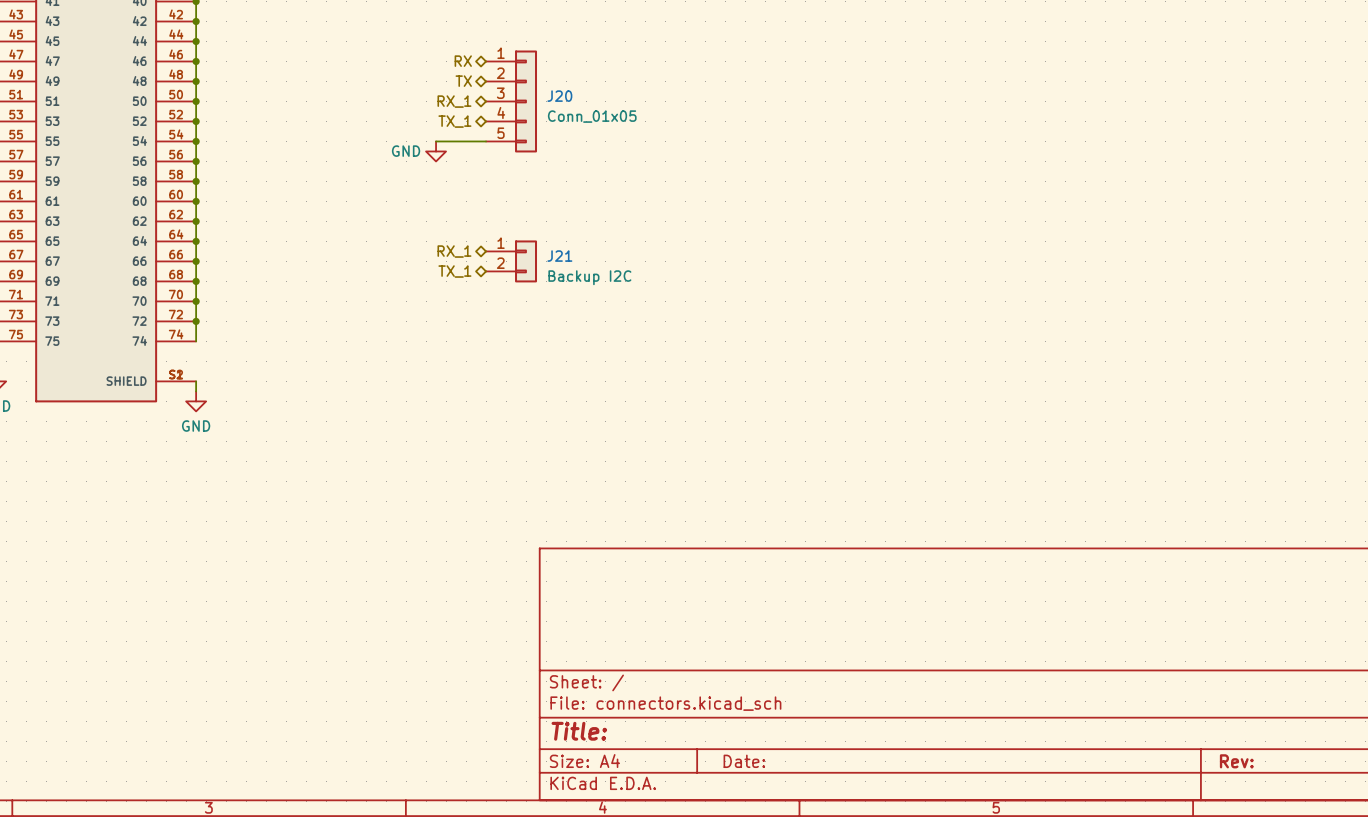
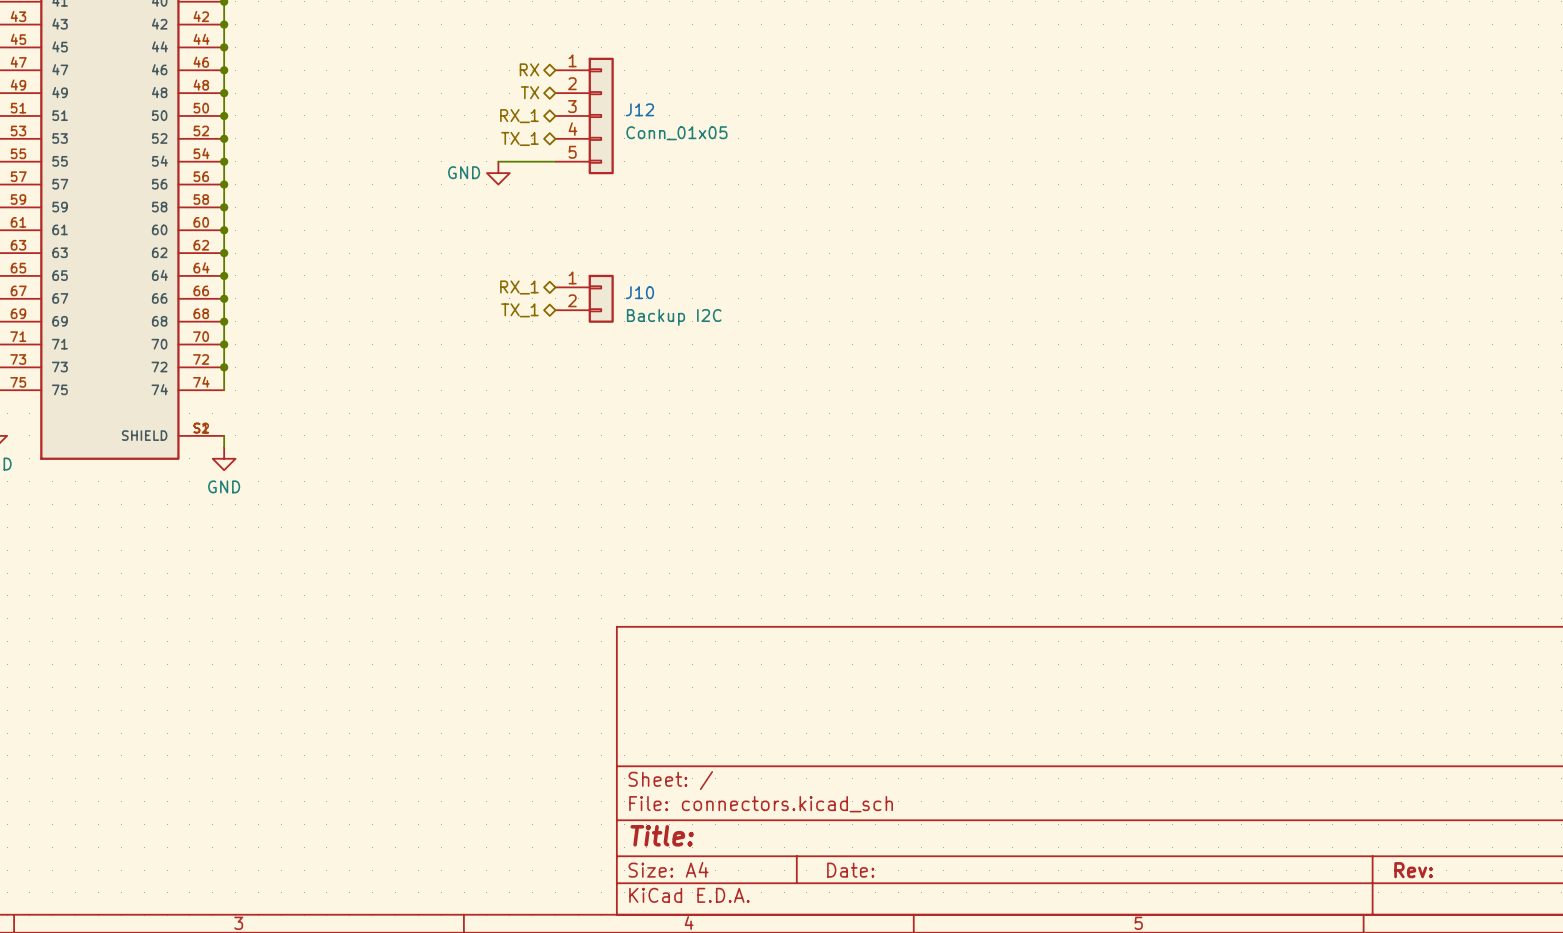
J20 name: J20 (559, 96) -> J12 (639, 109)
J21 name: J21 (559, 256) -> J10 (639, 292)

